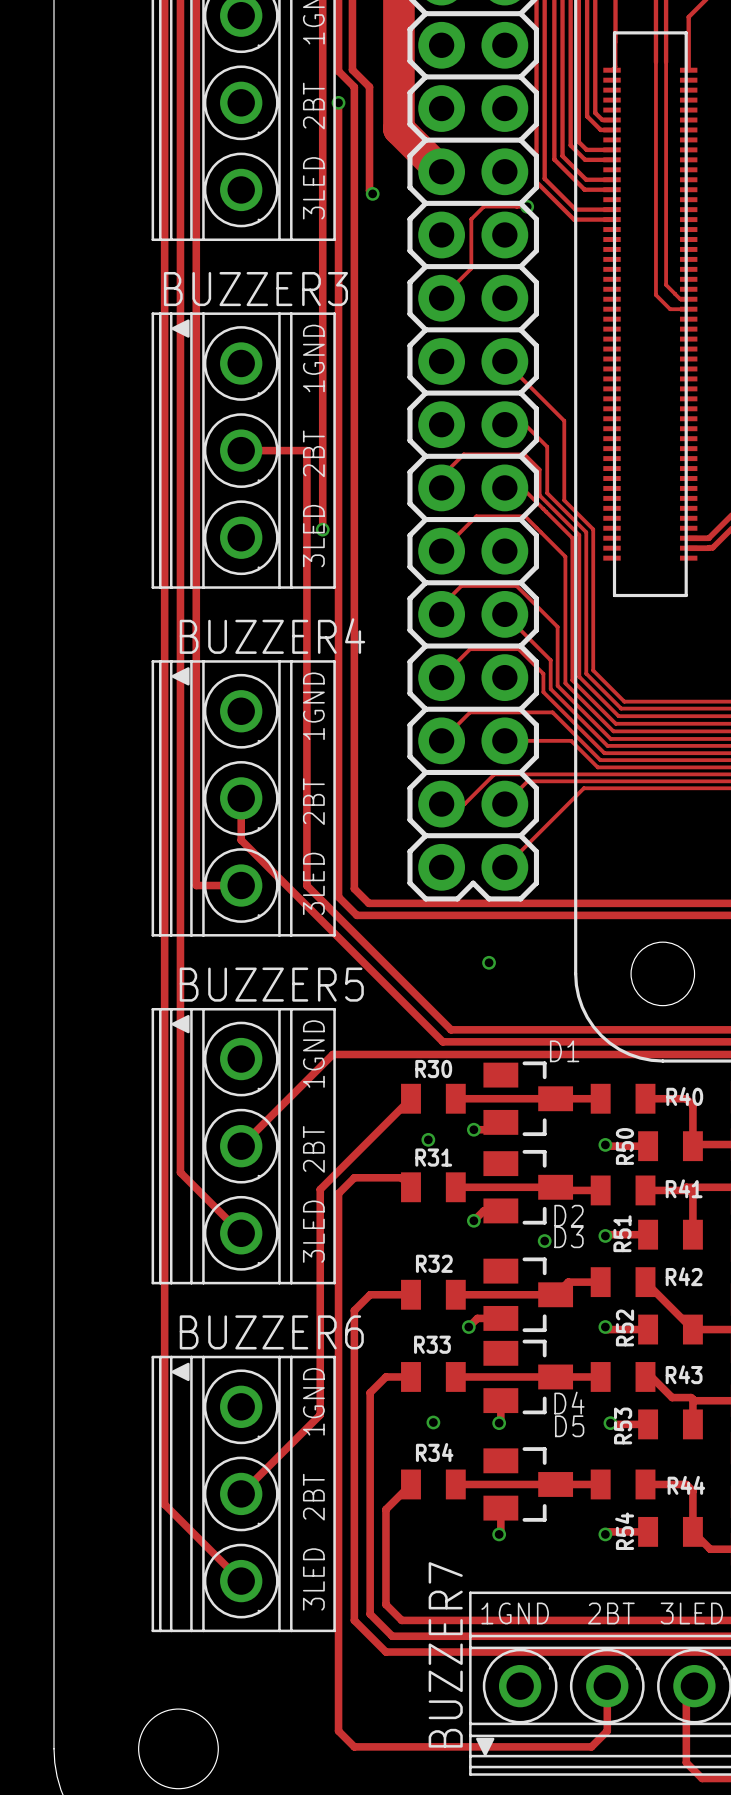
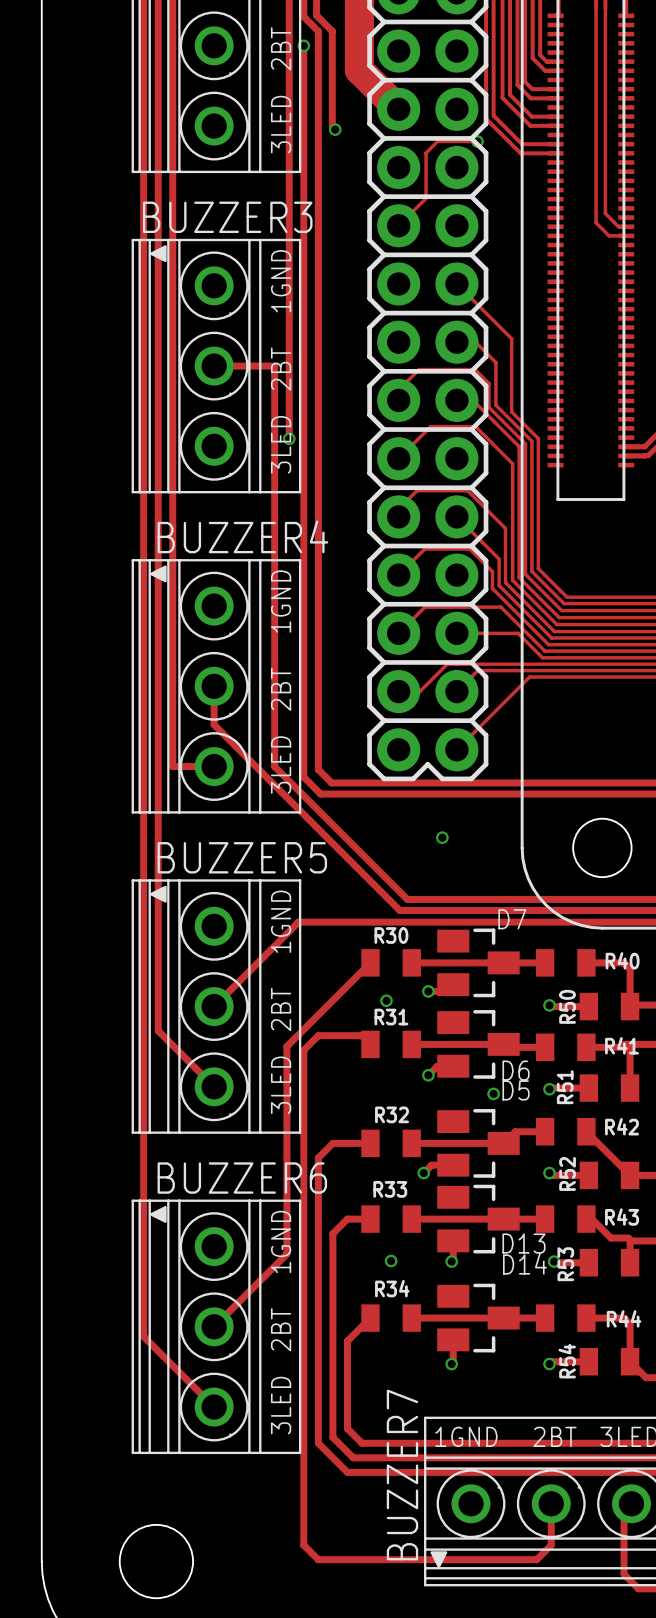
D1 name: D1 (564, 1051) -> D7 (512, 919)
D2 name: D2 (569, 1215) -> D6 (516, 1070)
D3 name: D3 (569, 1237) -> D5 (516, 1090)
D4 name: D4 (569, 1403) -> D13 (524, 1243)
D5 name: D5 (569, 1426) -> D14 (524, 1264)

